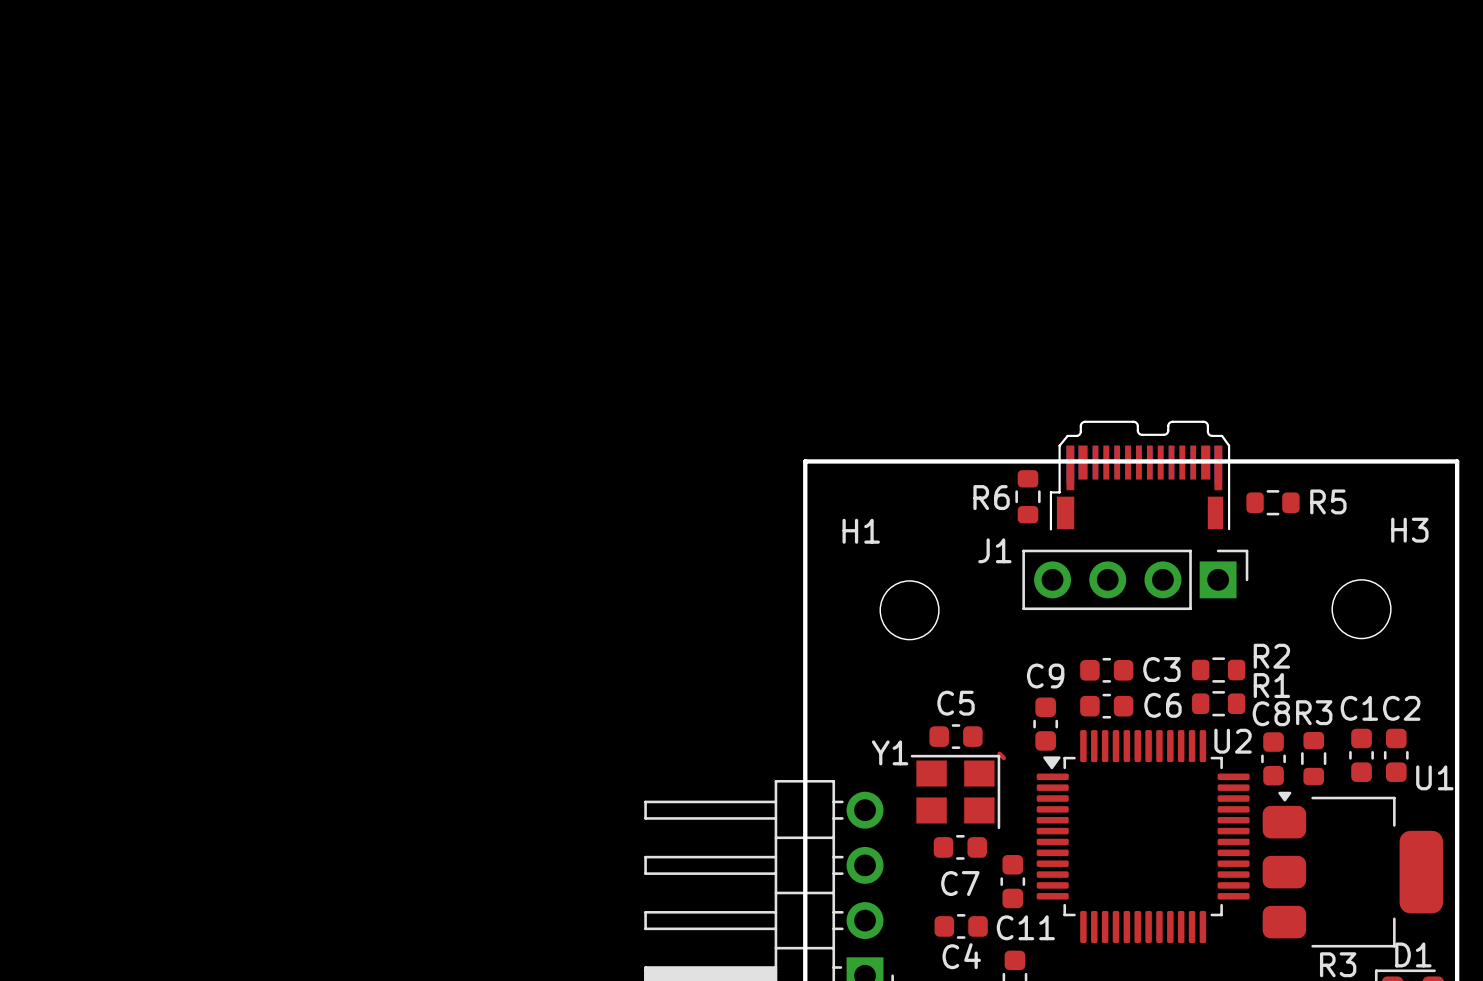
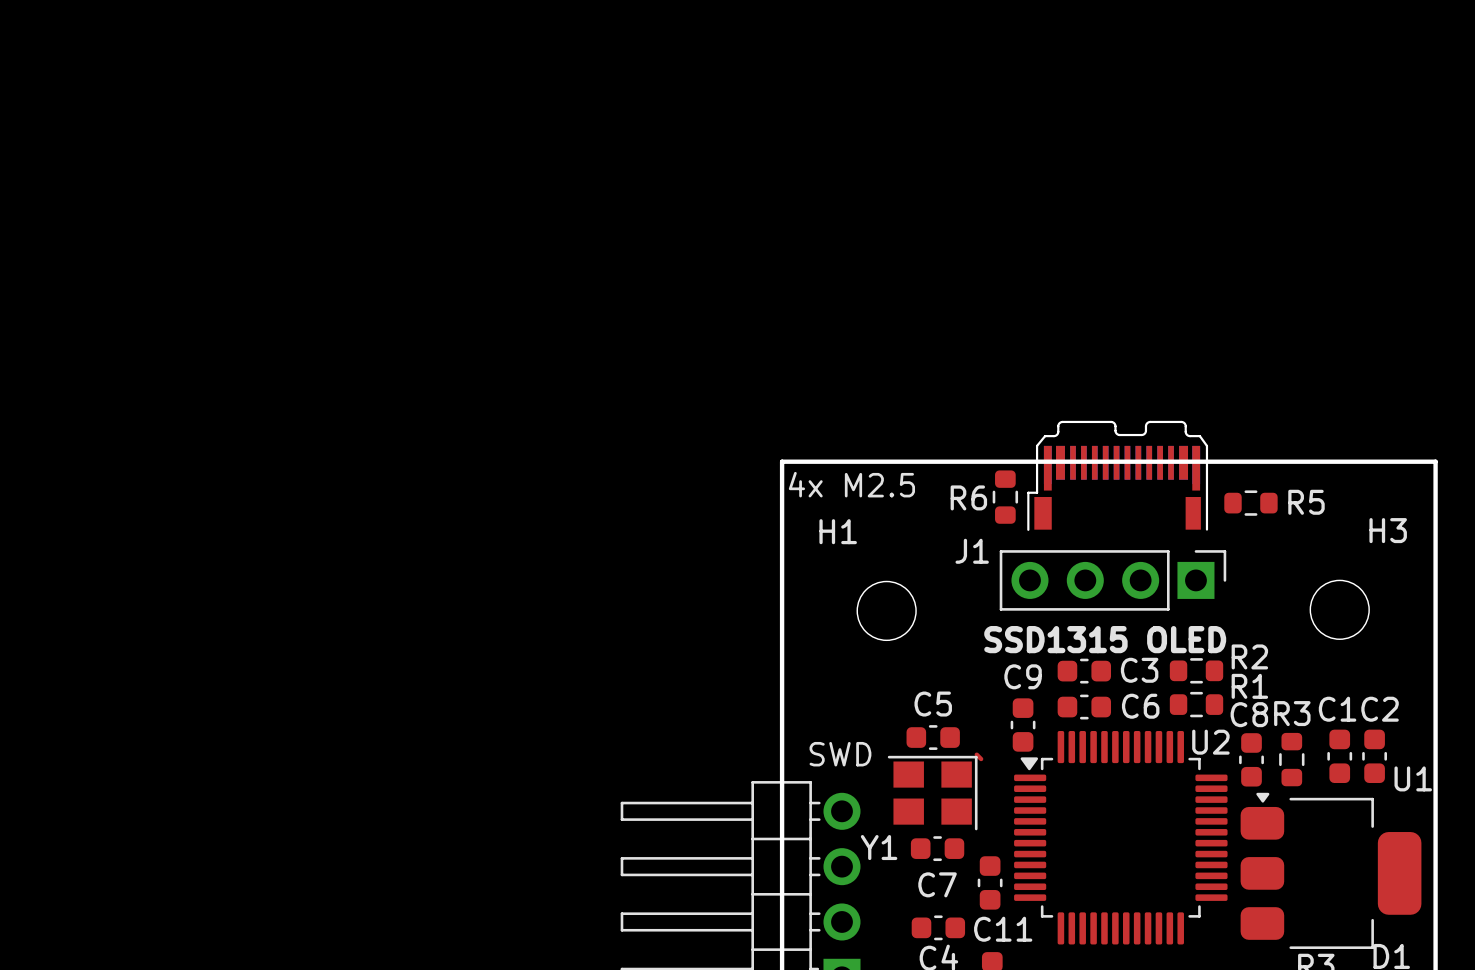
text: none -> 4x M2.5 (851, 484)
text: none -> SSD1315 OLED (1105, 639)
Y1 name position: Y1 (890, 752) -> Y1 (879, 847)
text: none -> SWD (840, 754)

